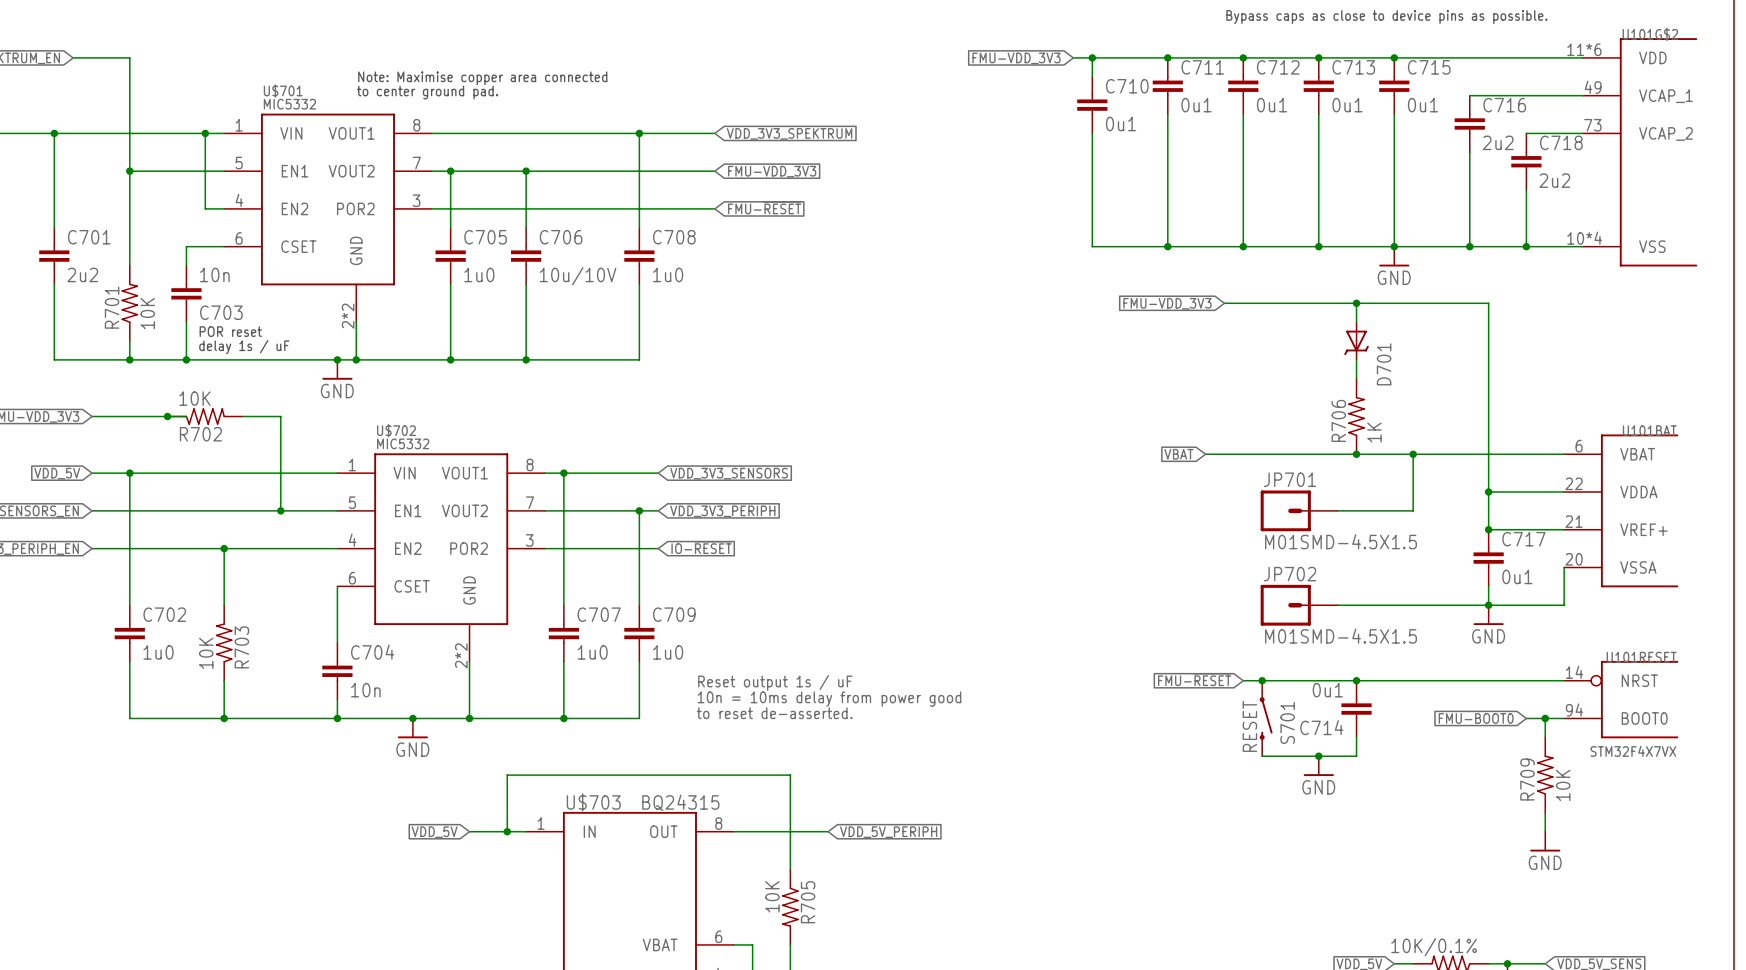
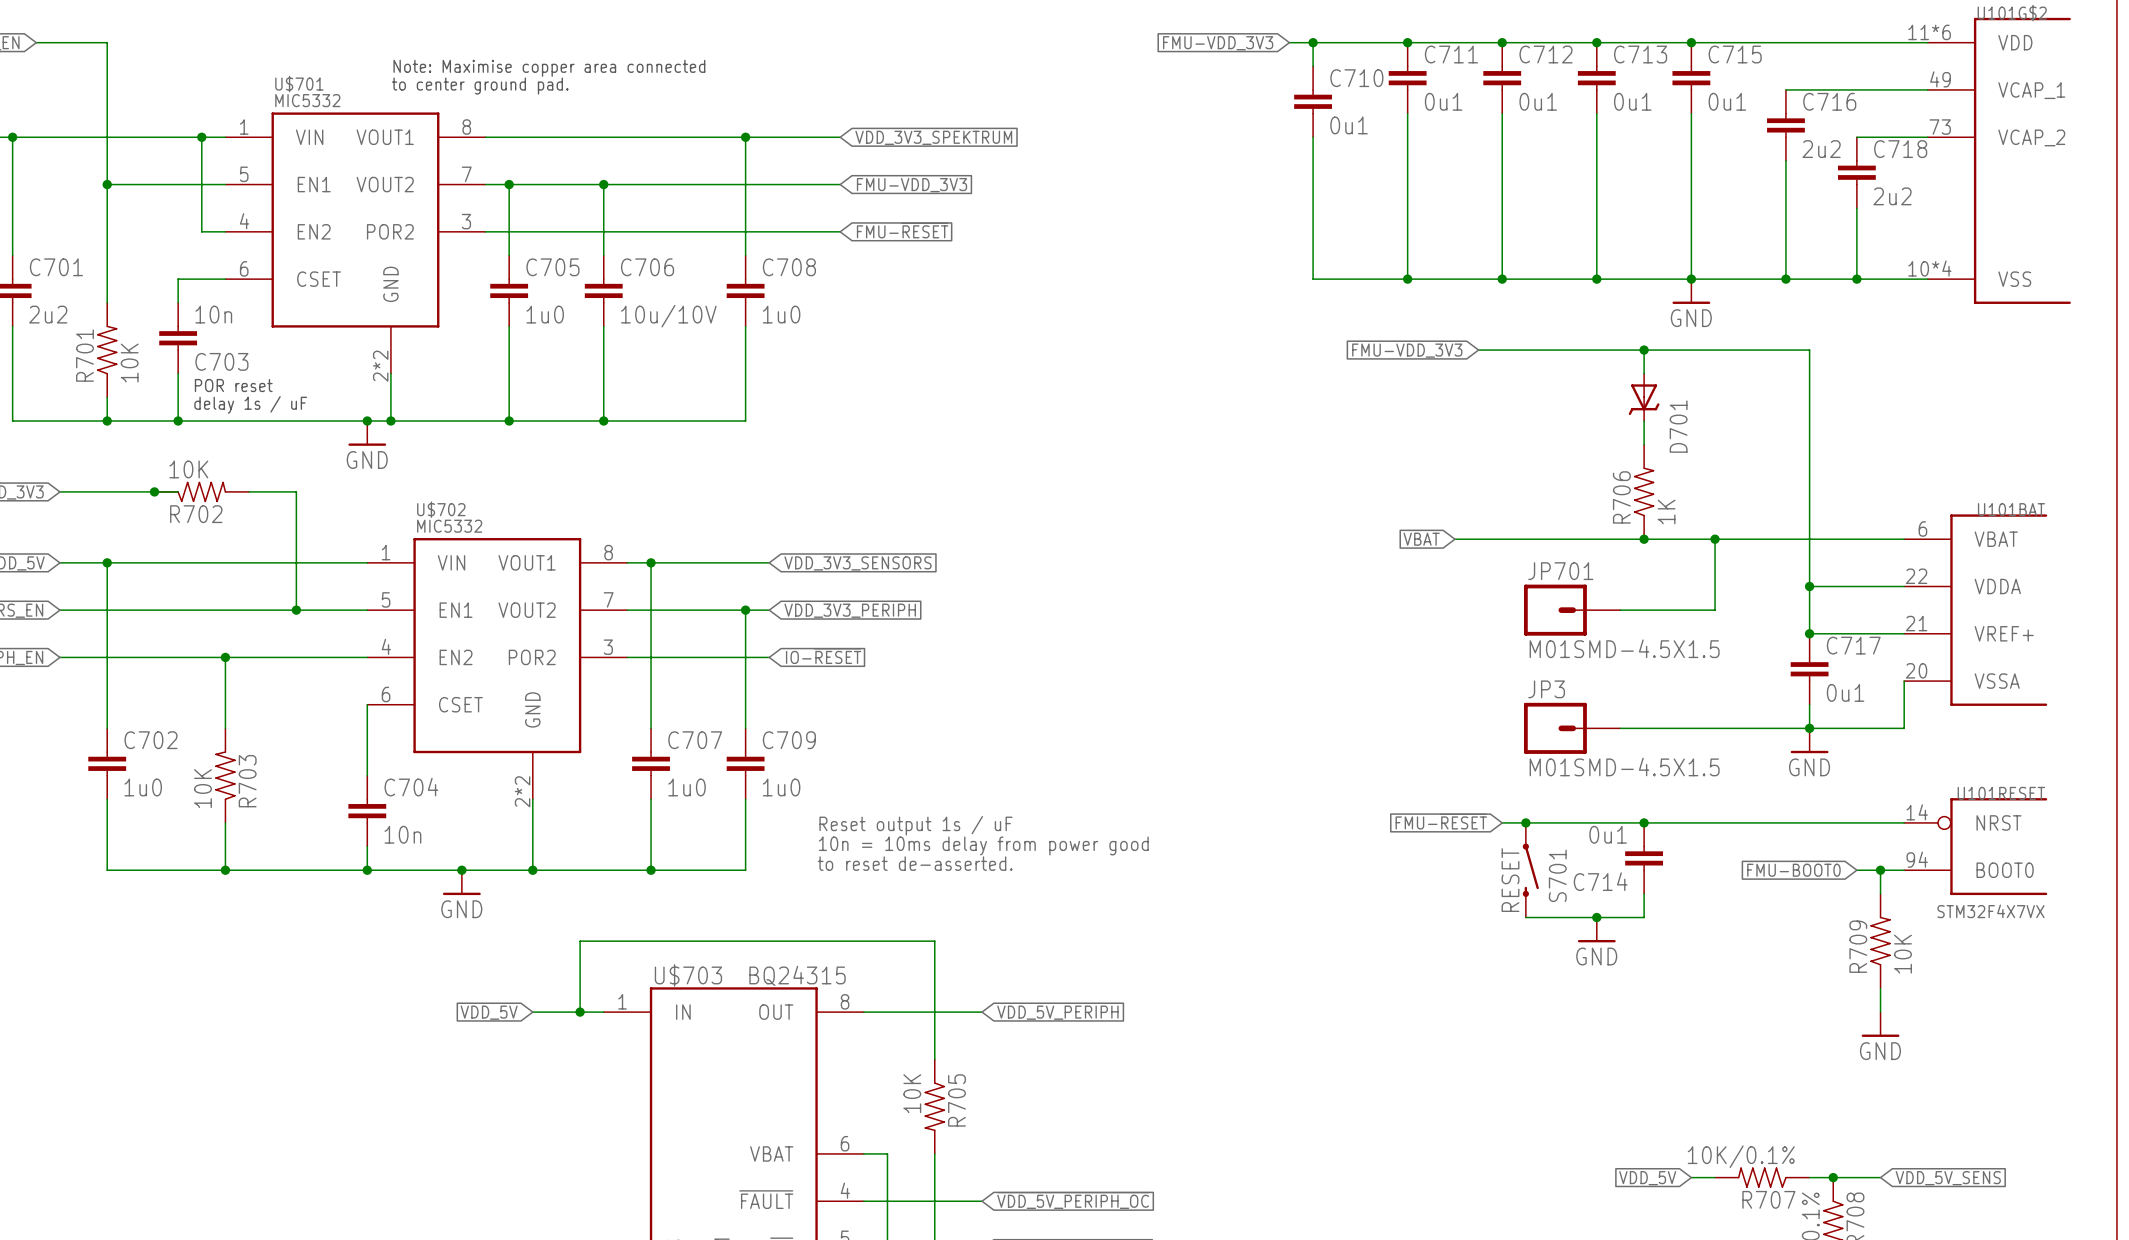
JP702 name: JP702 (1290, 574) -> JP3 (1546, 689)

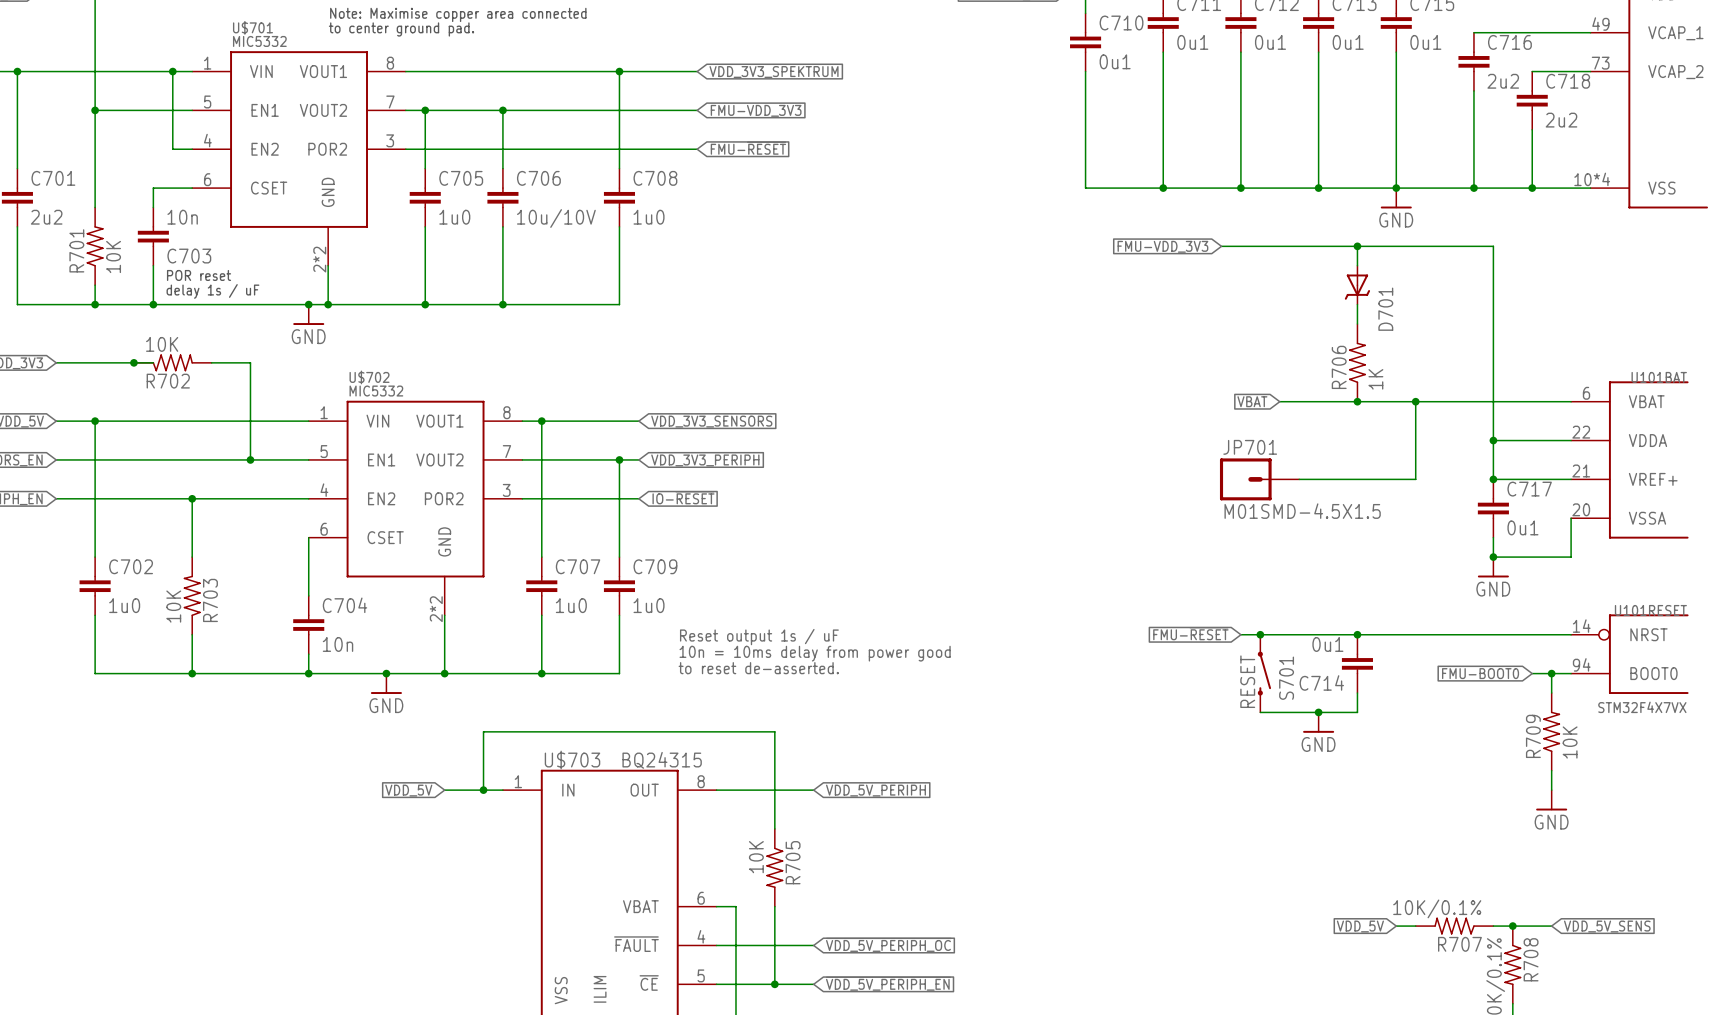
global label position: VBAT (1421, 539) -> VBAT (1252, 401)
wire: (1454, 539) (1549, 539) -> none
JP701 position: (1572, 610) -> (1259, 479)
wire: (1620, 610) (1715, 610) -> (1299, 479) (1415, 479) (1415, 459)
JP3: M01SMD-4.5X1.5 (1572, 728) -> none
wire: (1620, 728) (1809, 728) -> none

